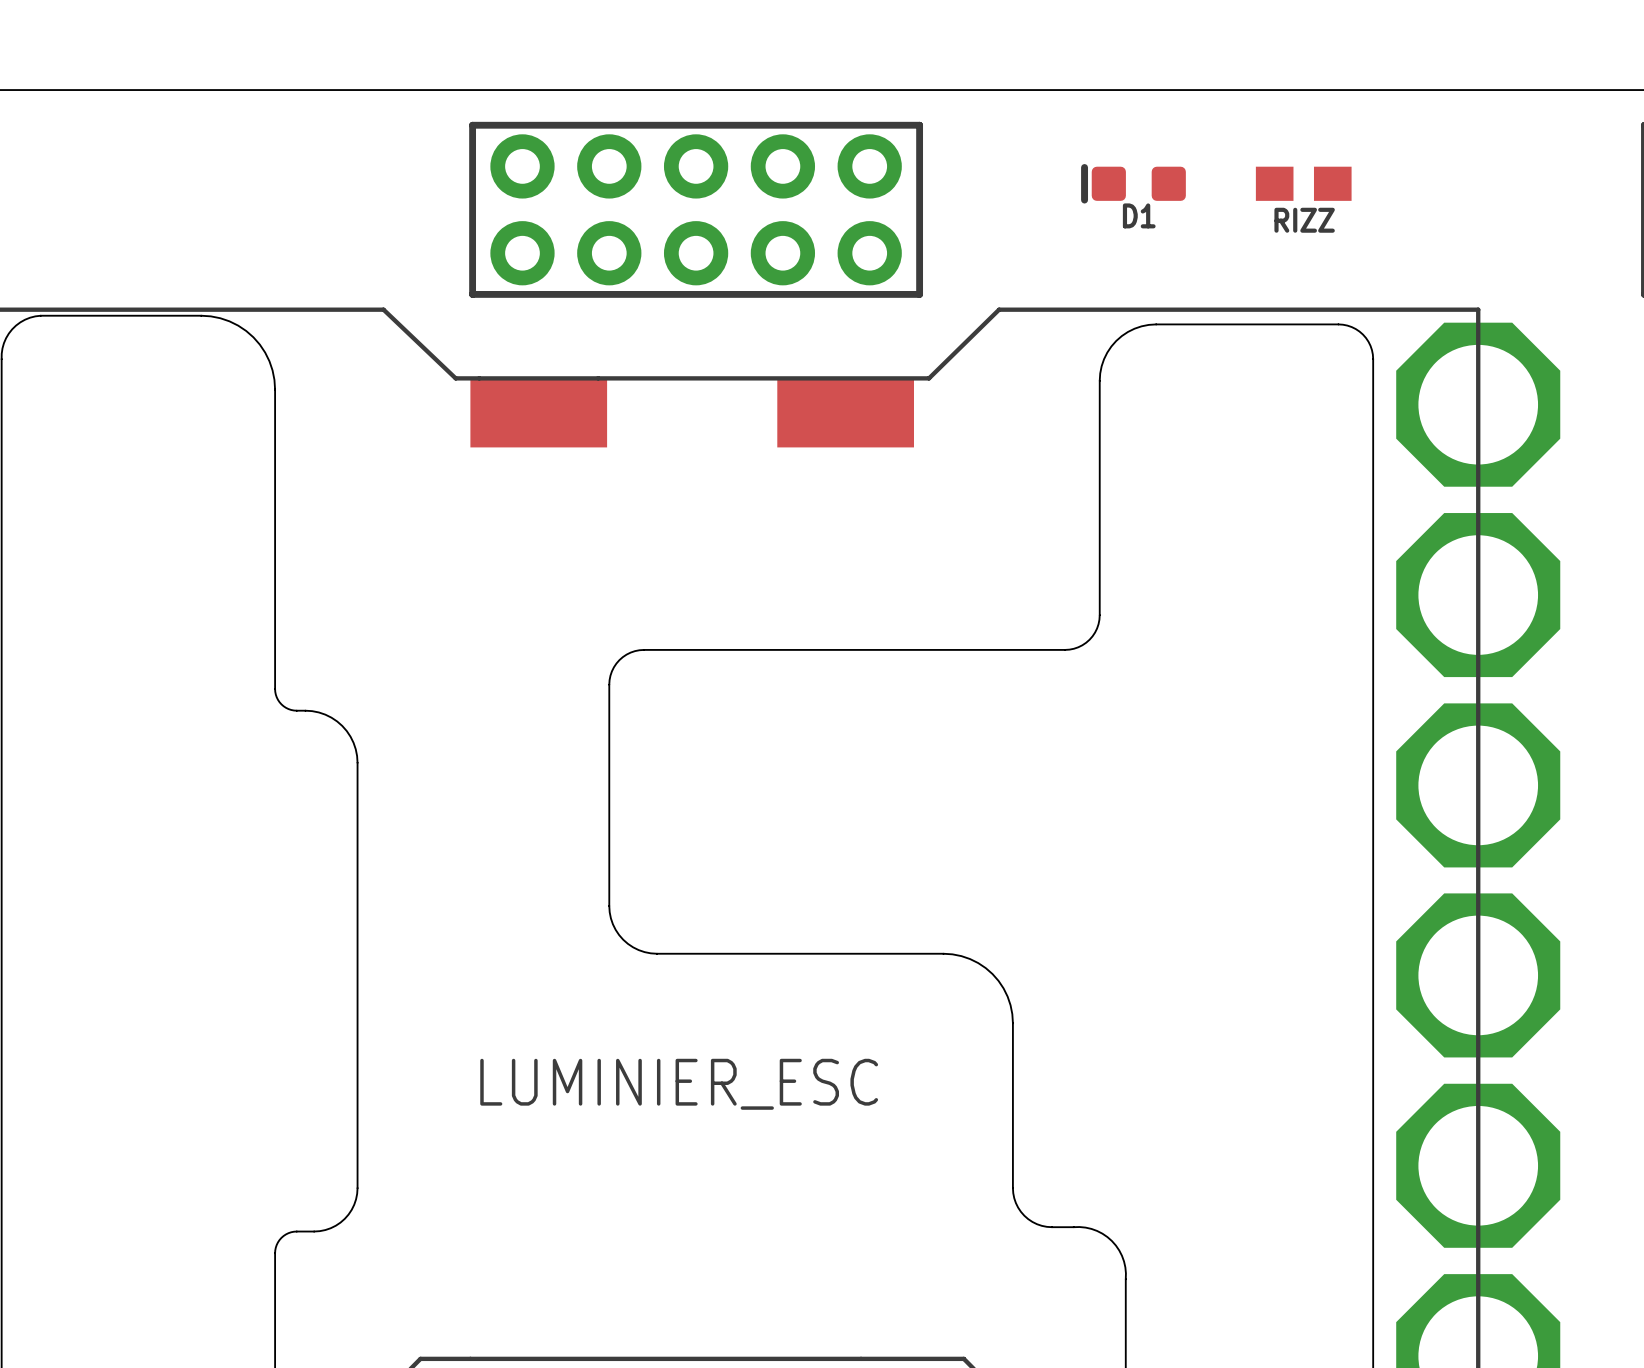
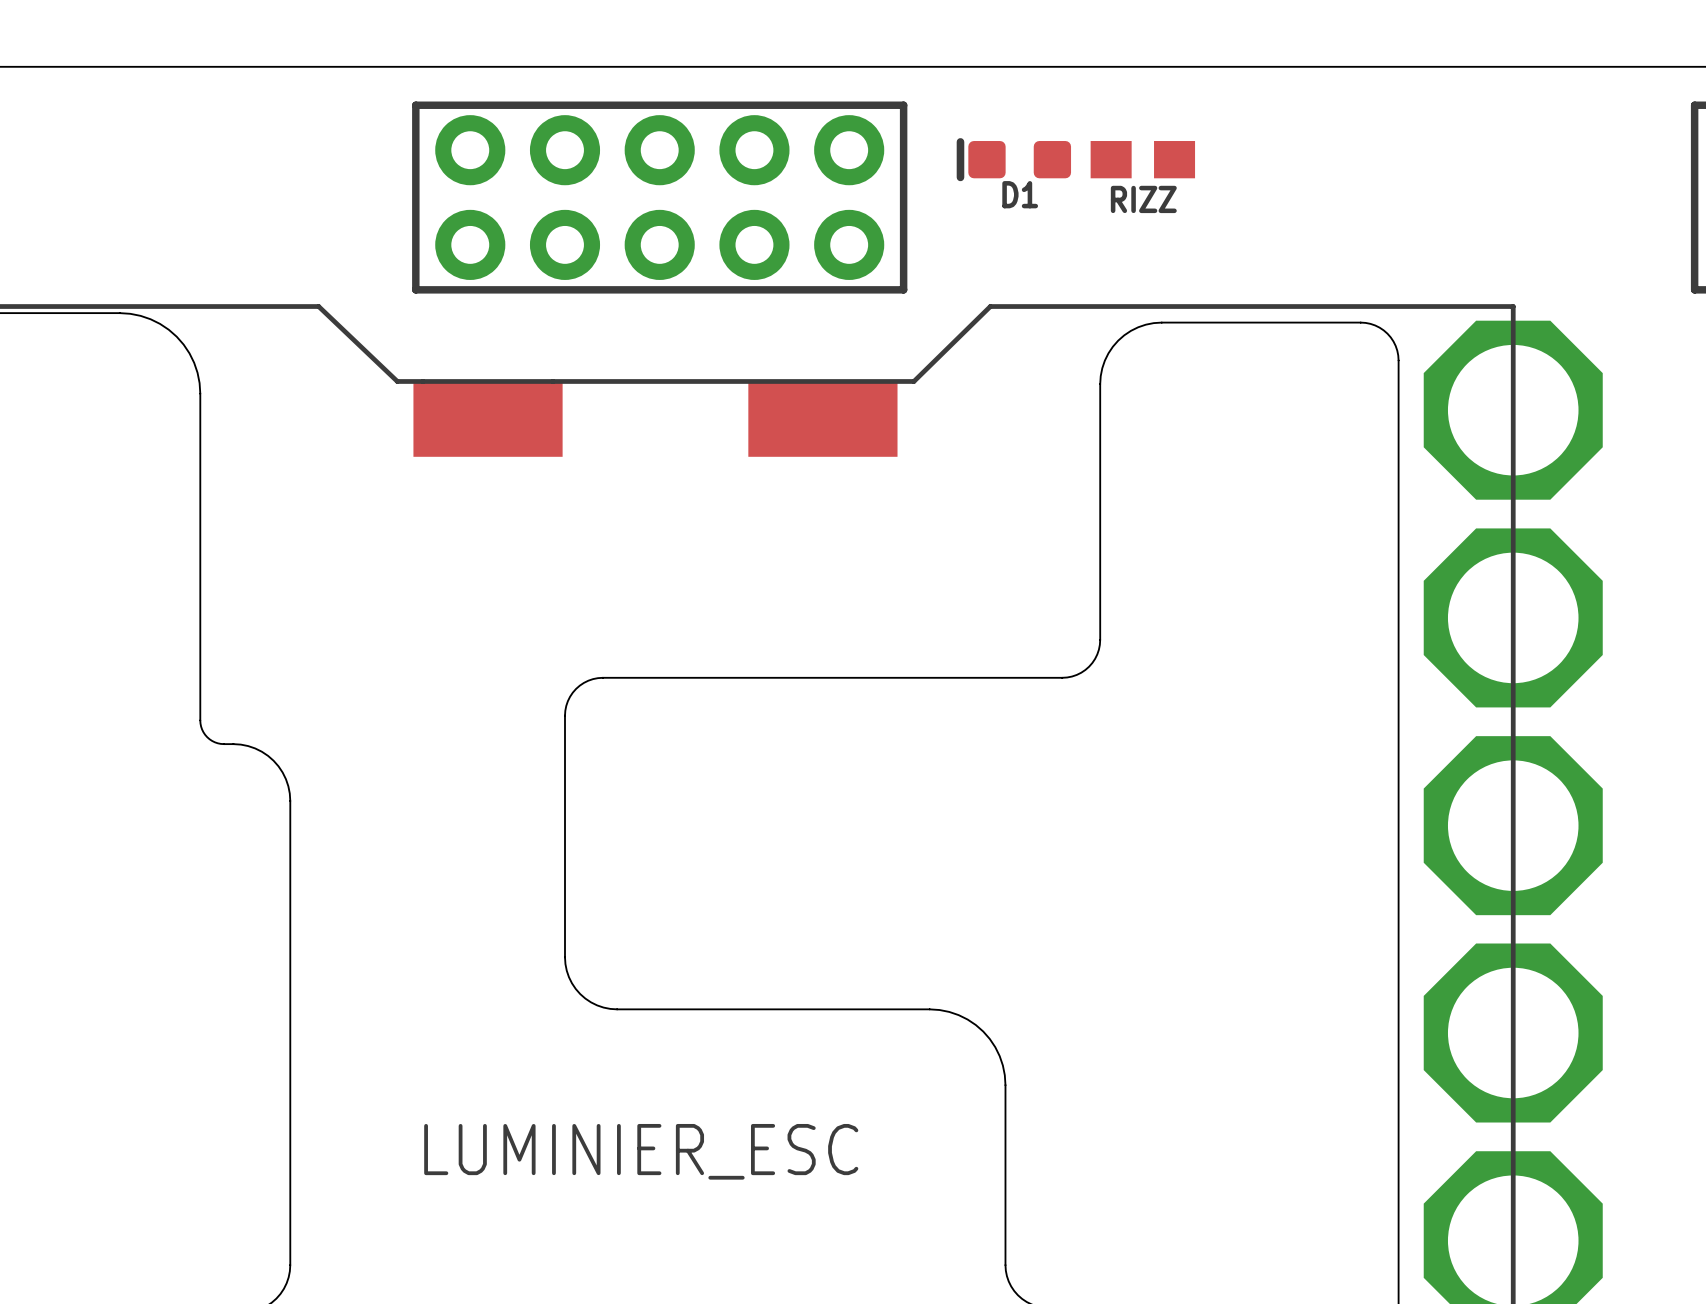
D1 position: (1133, 183) -> (1013, 159)
RIZZ position: (1303, 183) -> (1142, 159)

